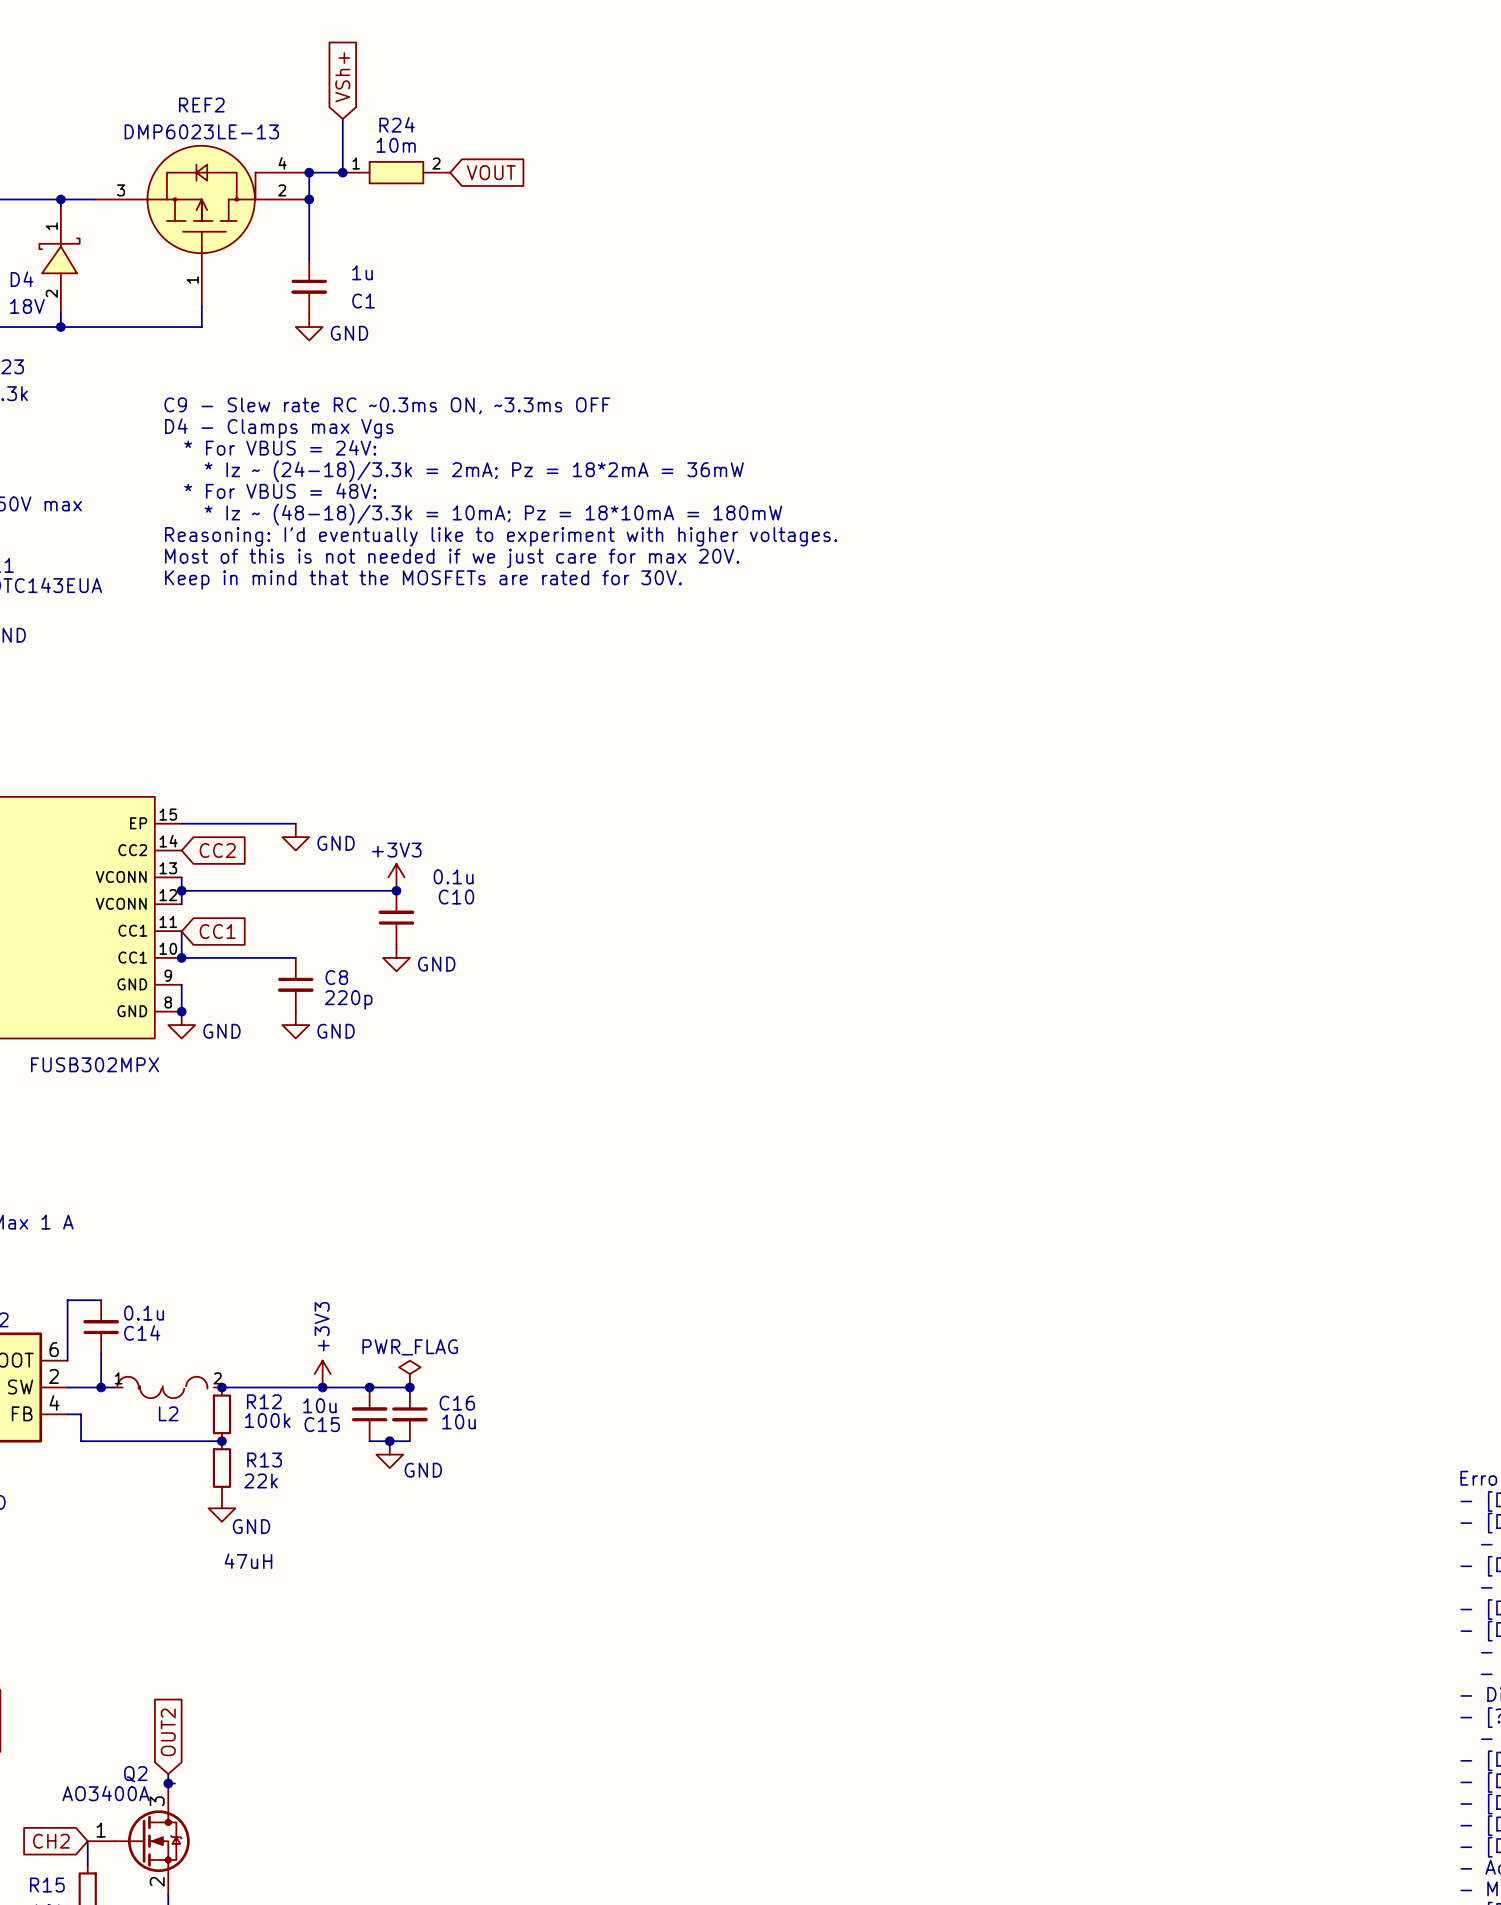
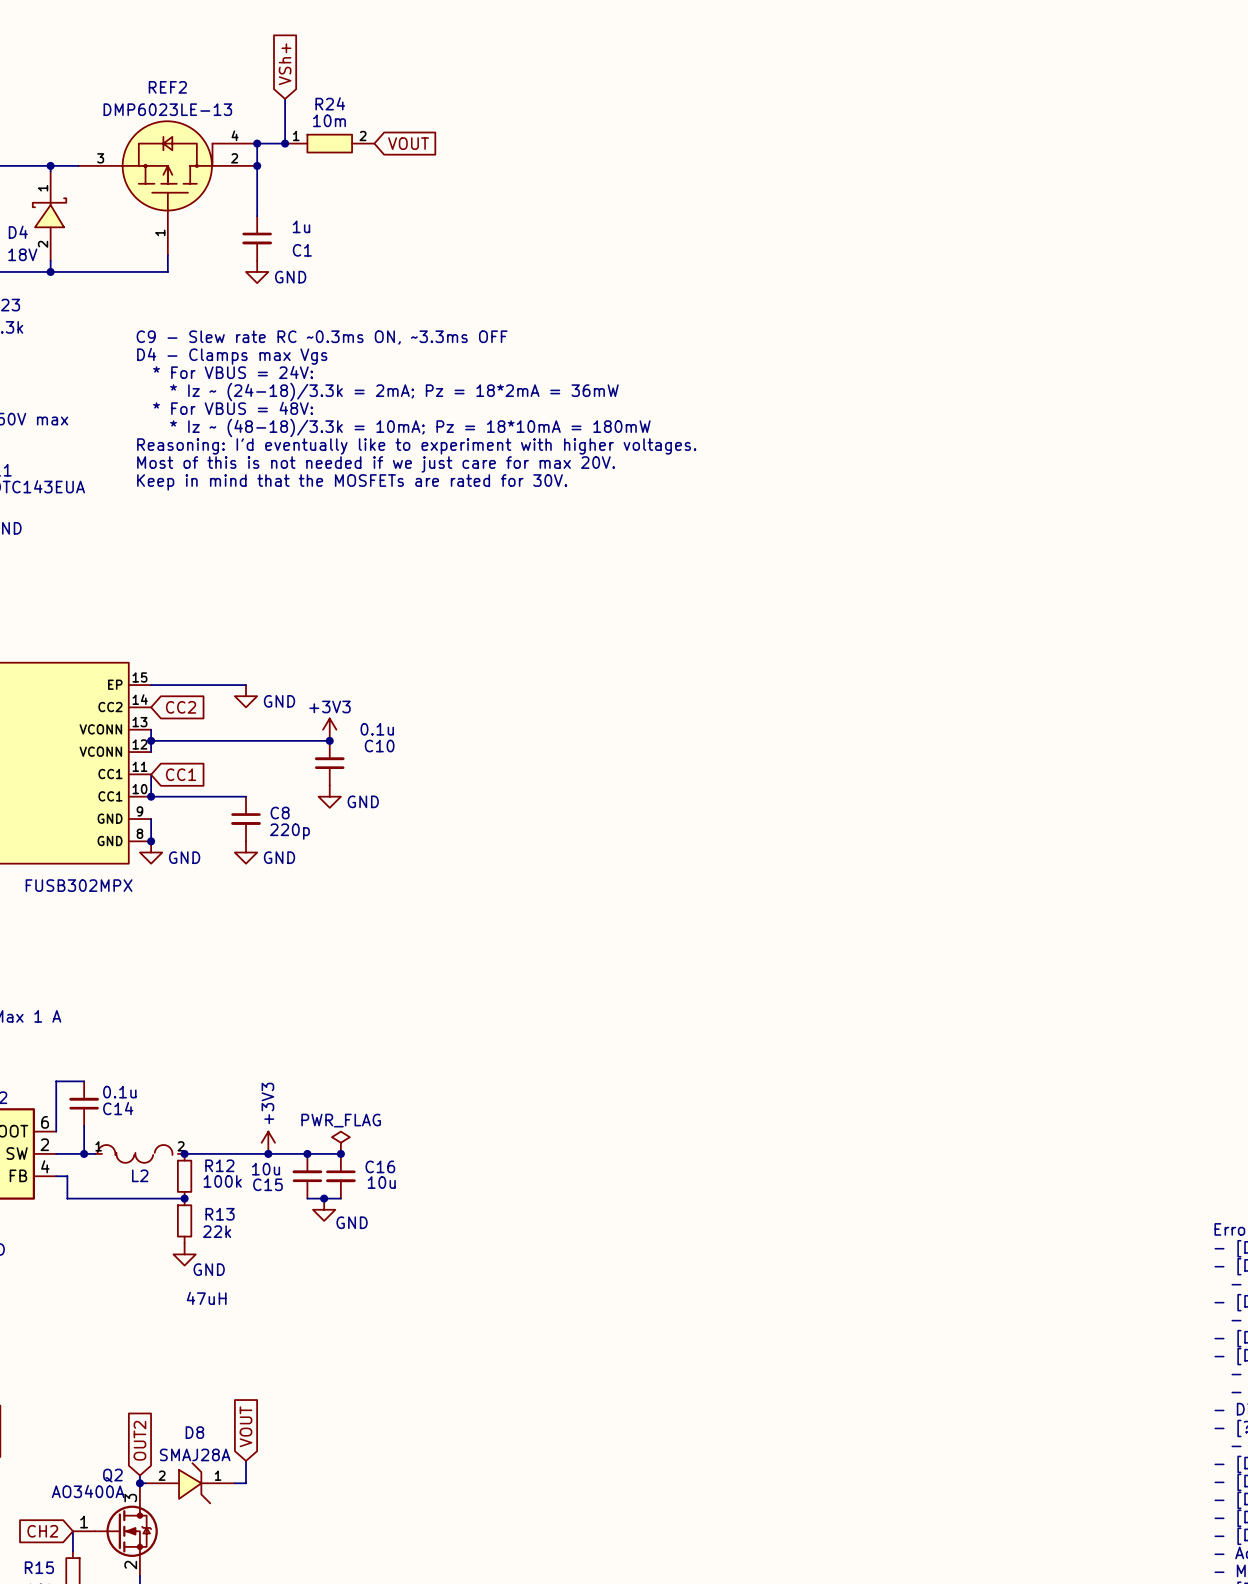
global label: none -> VOUT (246, 1426)
wire: none -> (246, 1460) (246, 1483) (234, 1483)
D8: none -> SMAJ28A (190, 1483)

